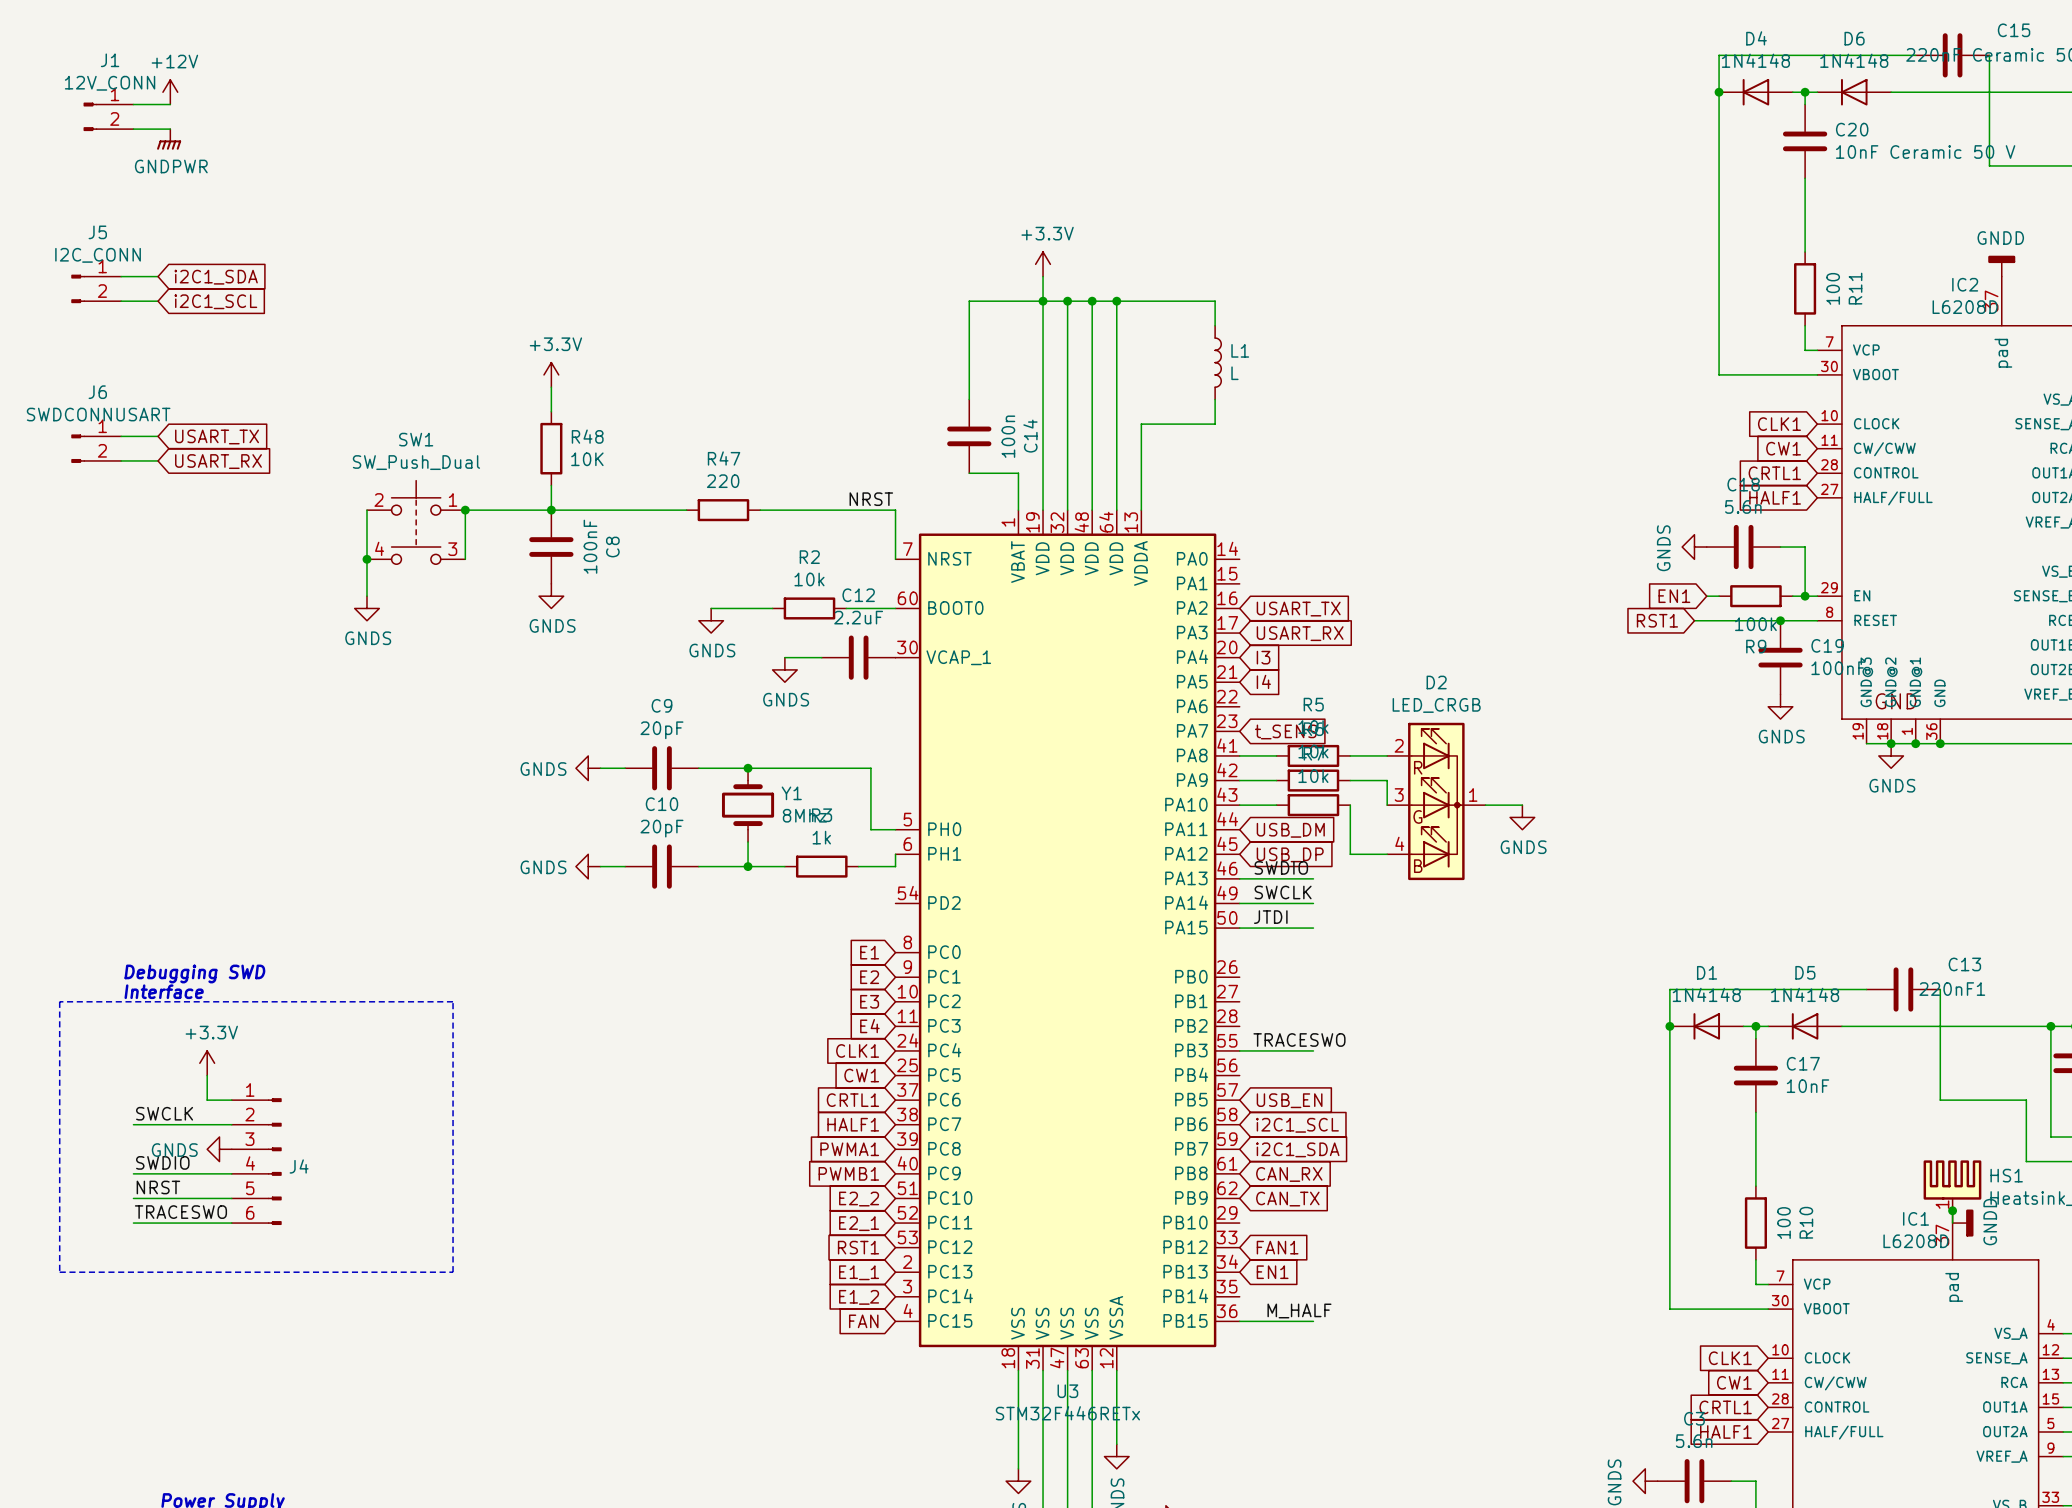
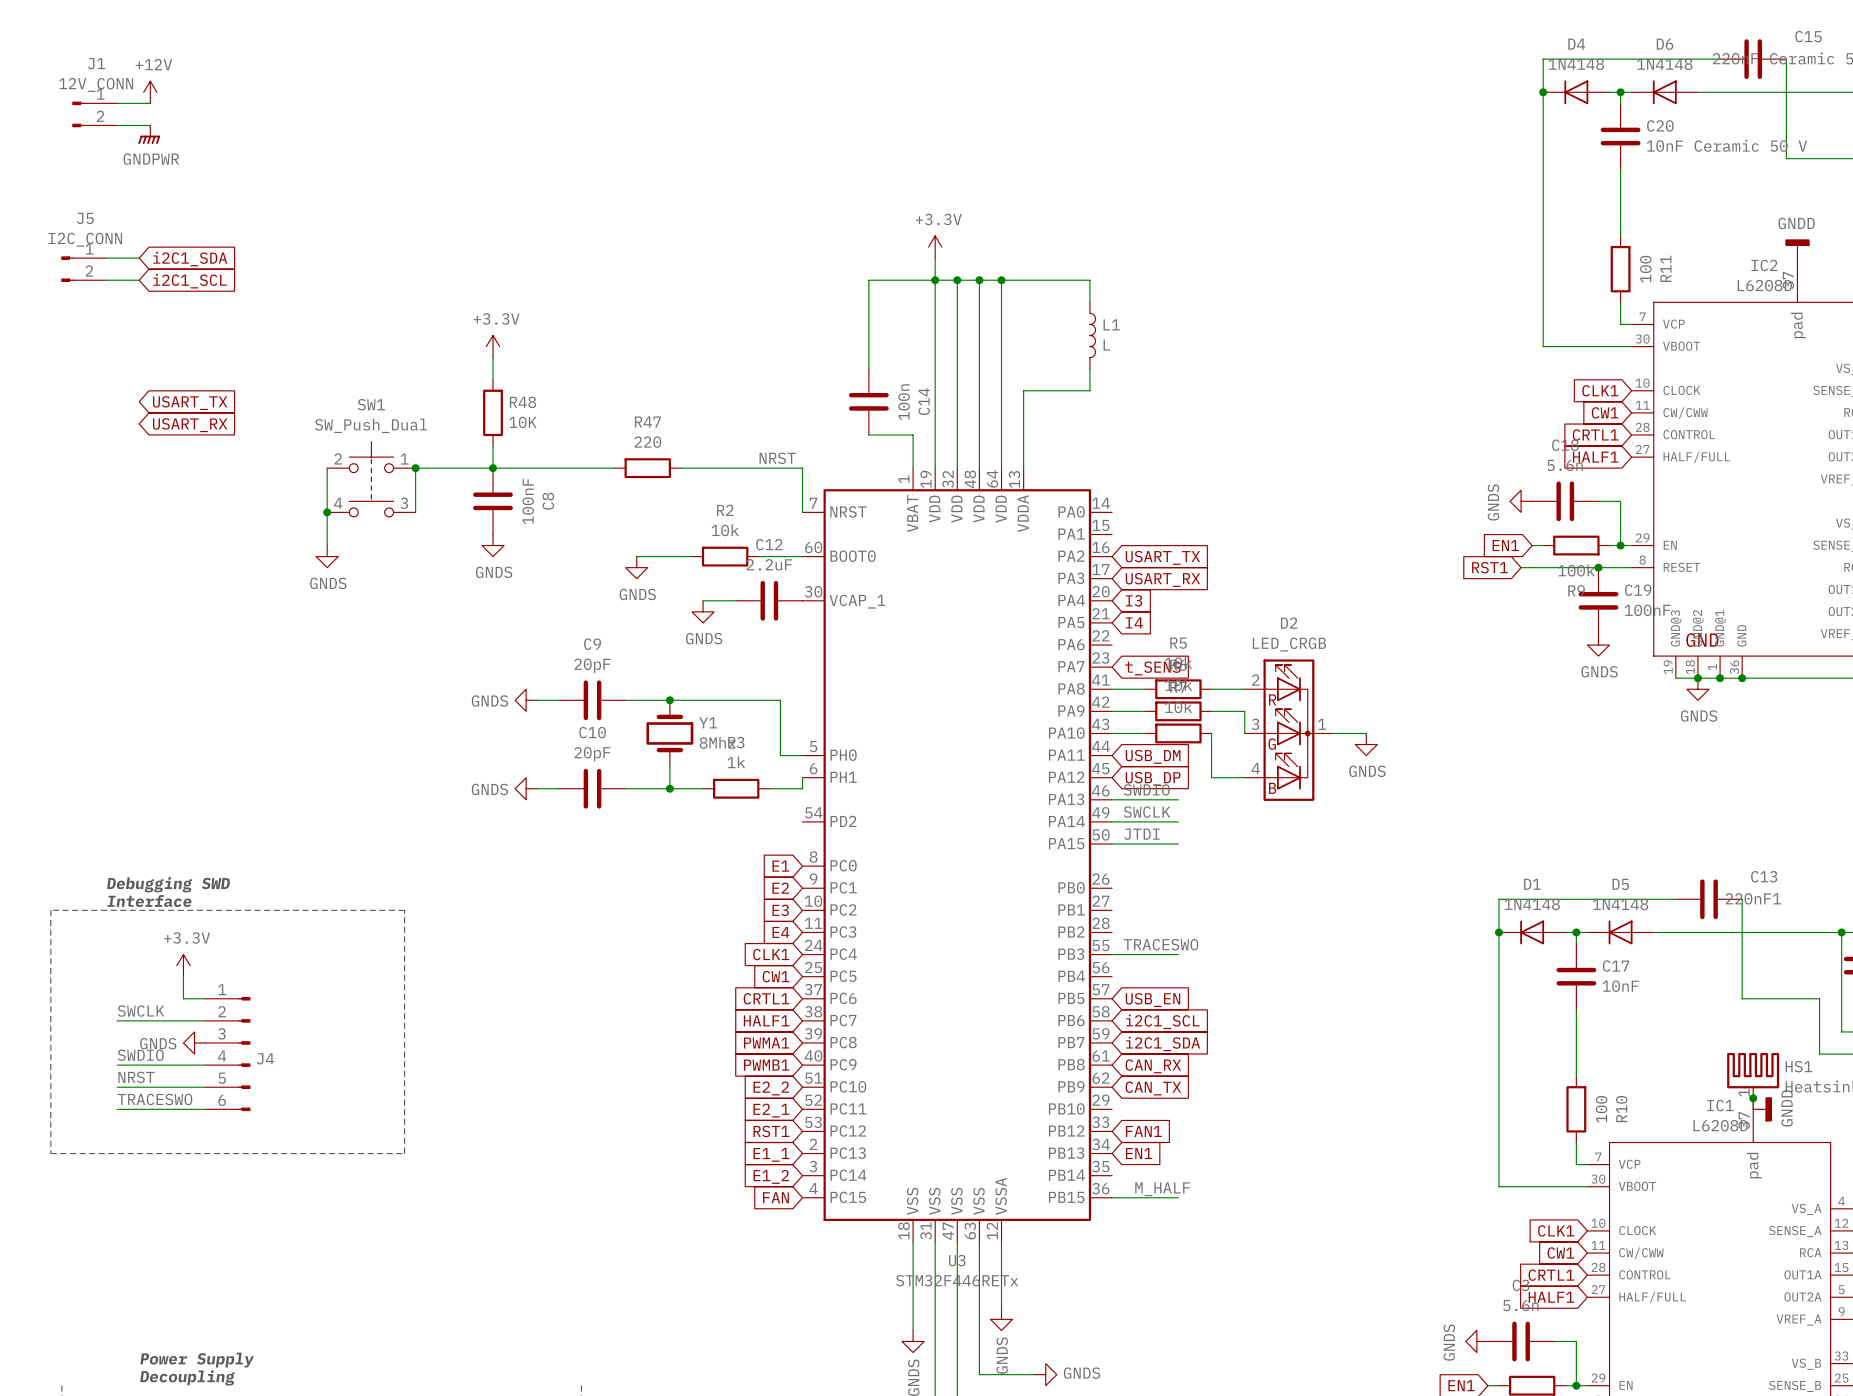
wire: (121, 436) (158, 436) -> none
J6: SWDCONNUSART (96, 448) -> none
wire: (121, 460) (158, 460) -> none

